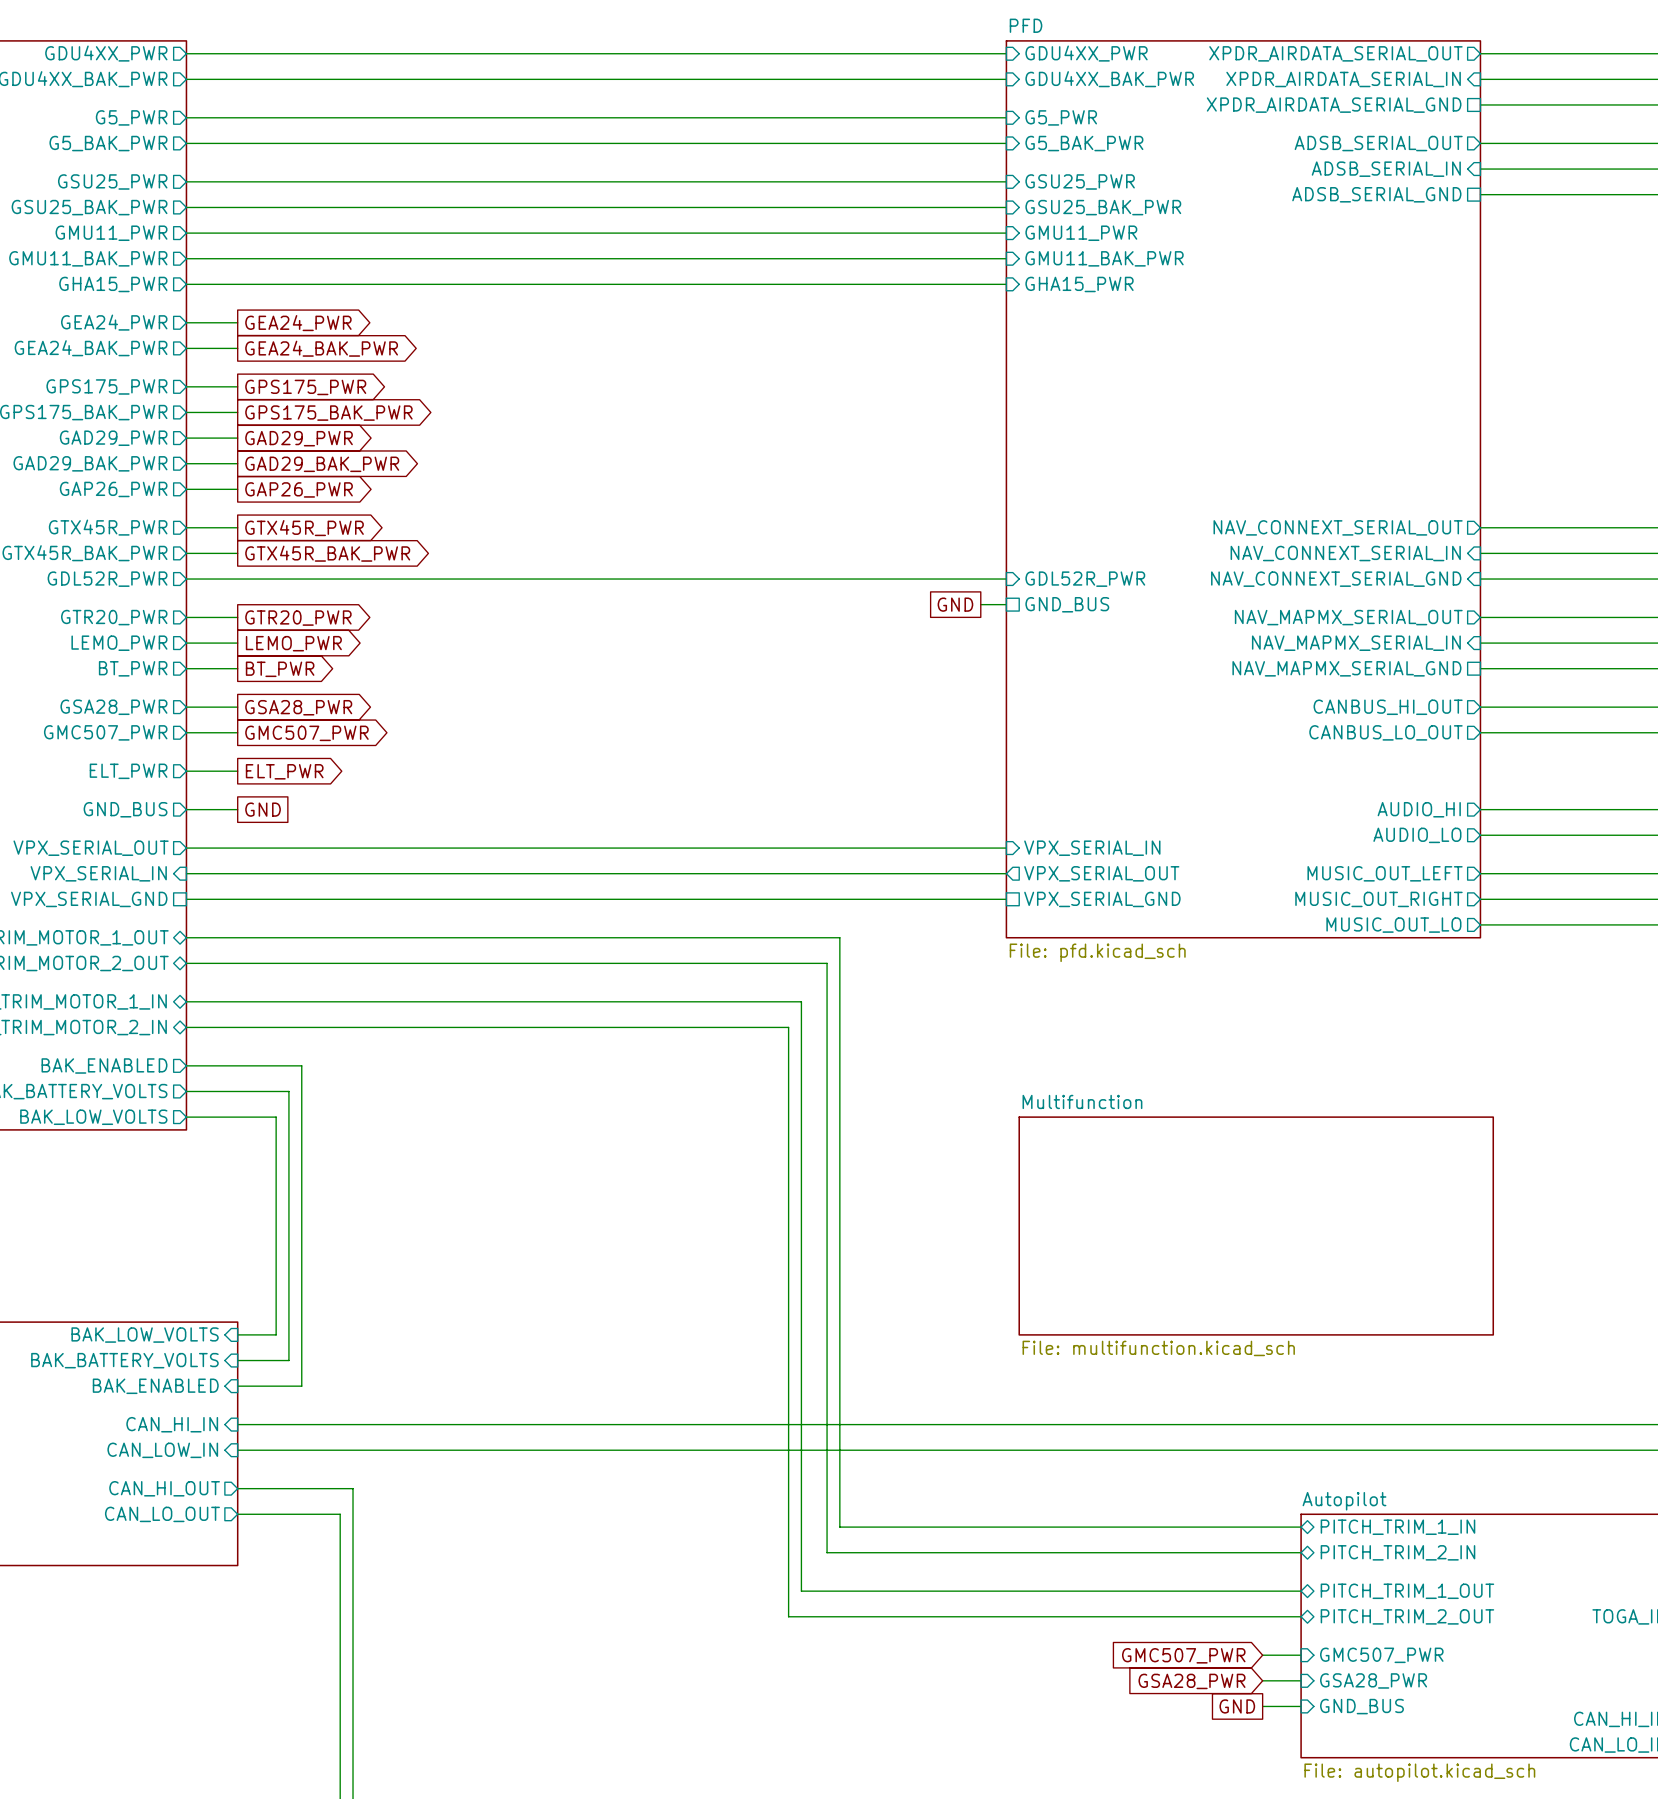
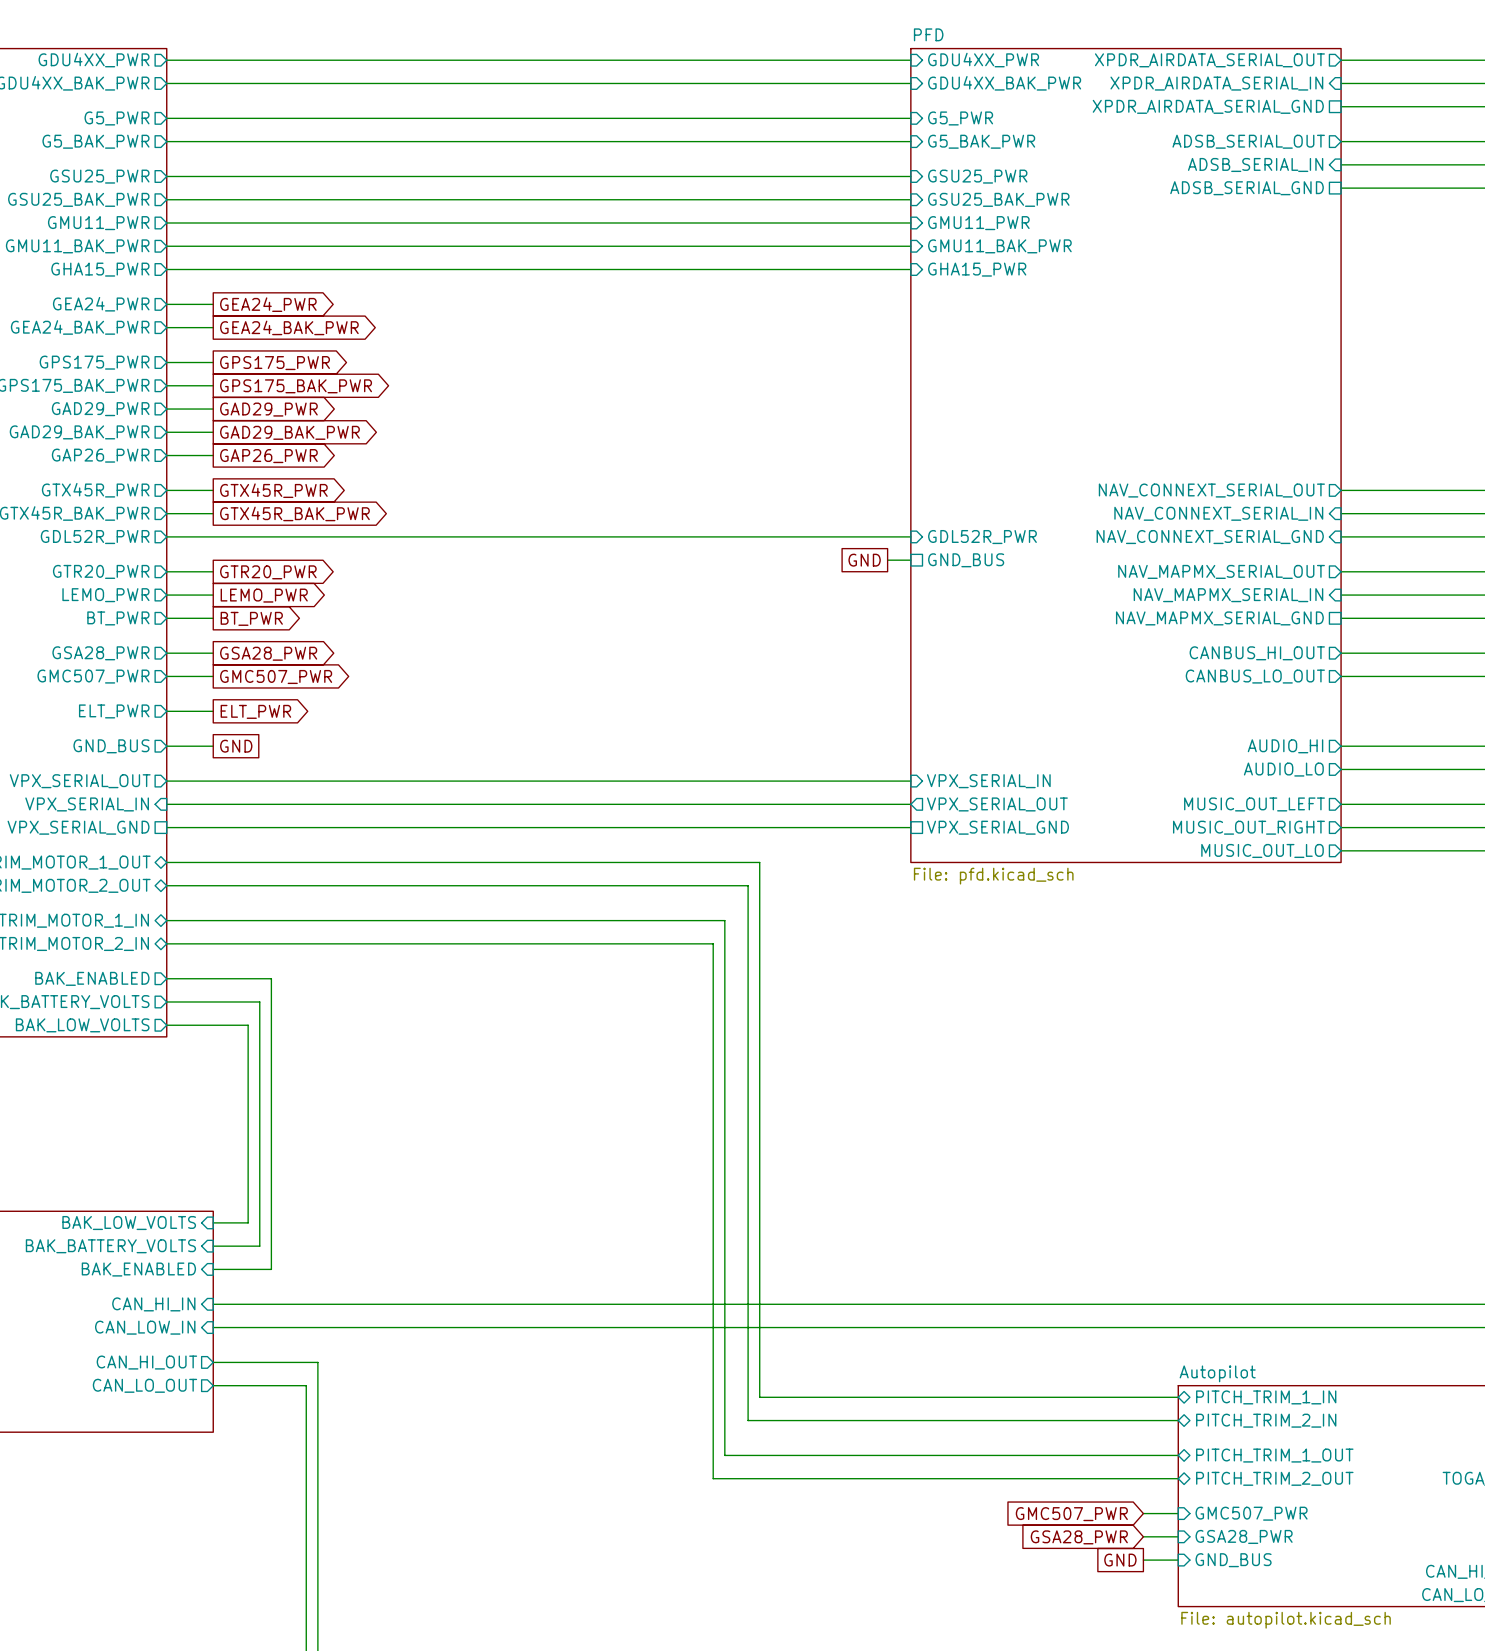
sheet Multifunction: File: multifunction.kicad_sch (1256, 1226) -> none

